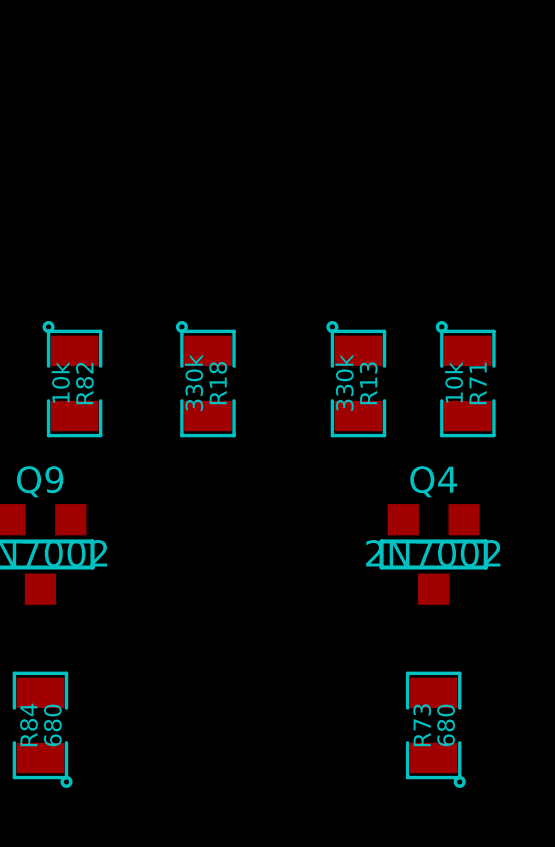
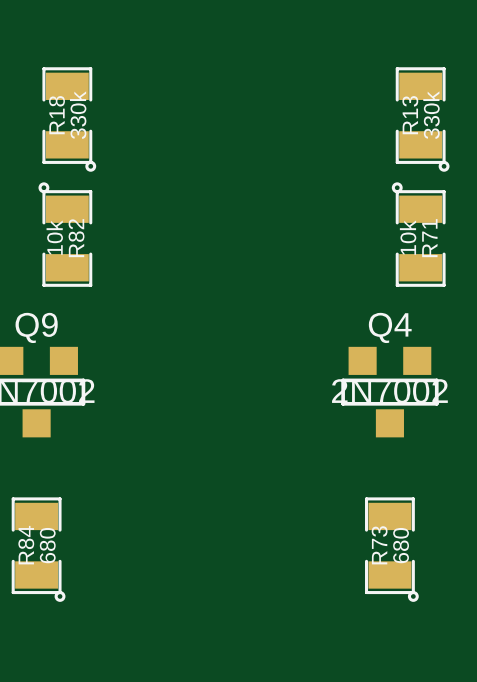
R18 rotation: 0° (205, 379) -> 180° (69, 119)
R18 position: (205, 379) -> (69, 119)
R13 rotation: 0° (356, 379) -> 180° (422, 119)
R13 position: (356, 379) -> (422, 119)

